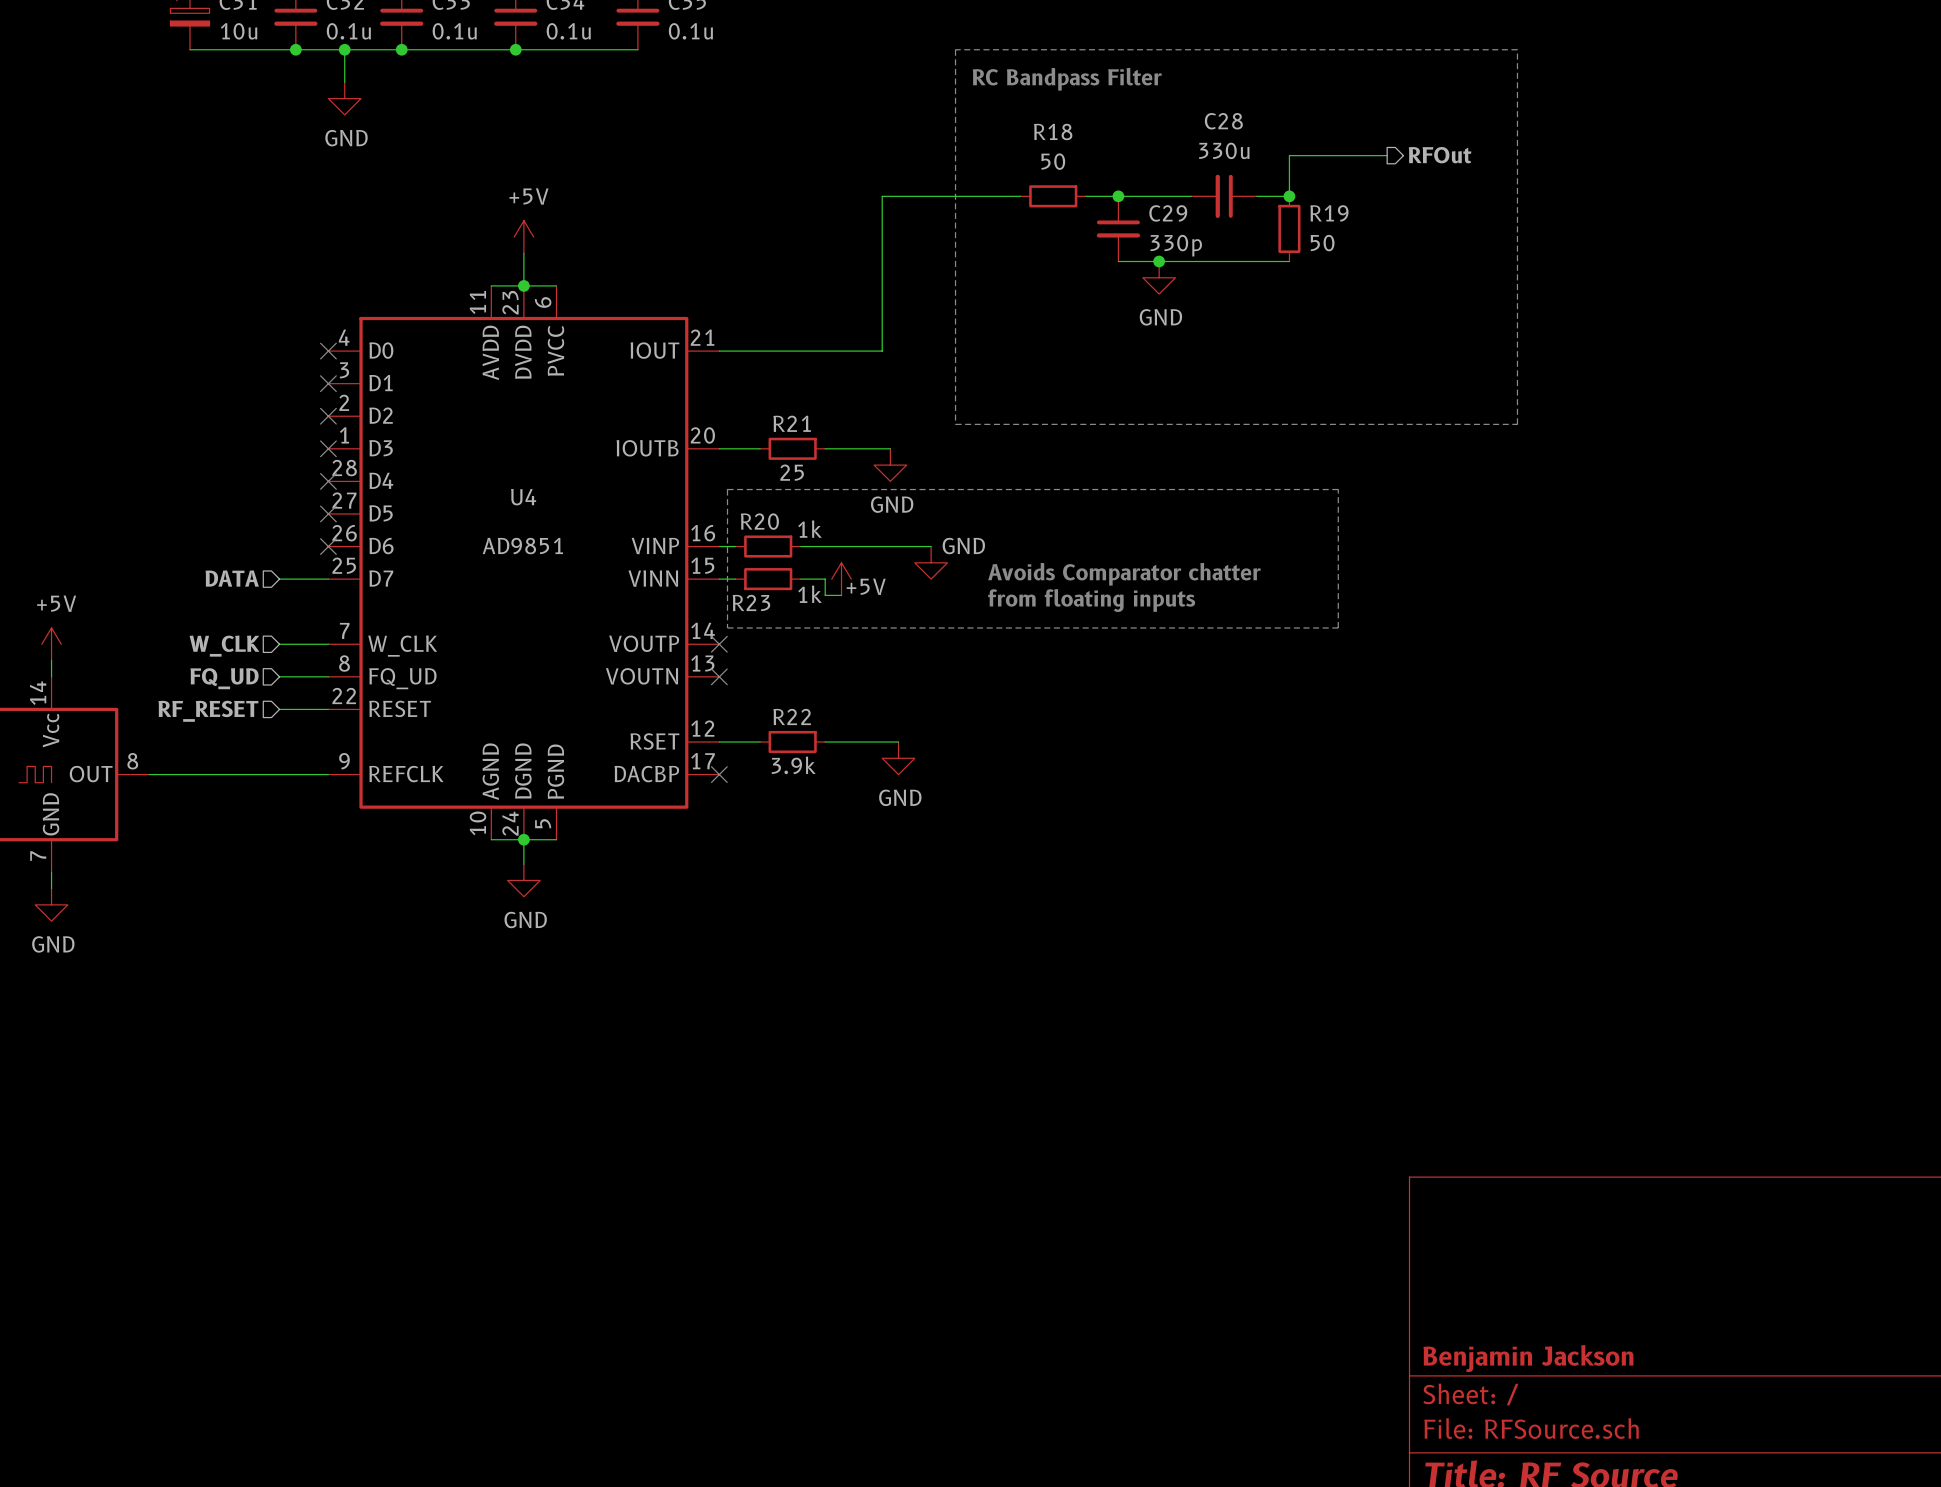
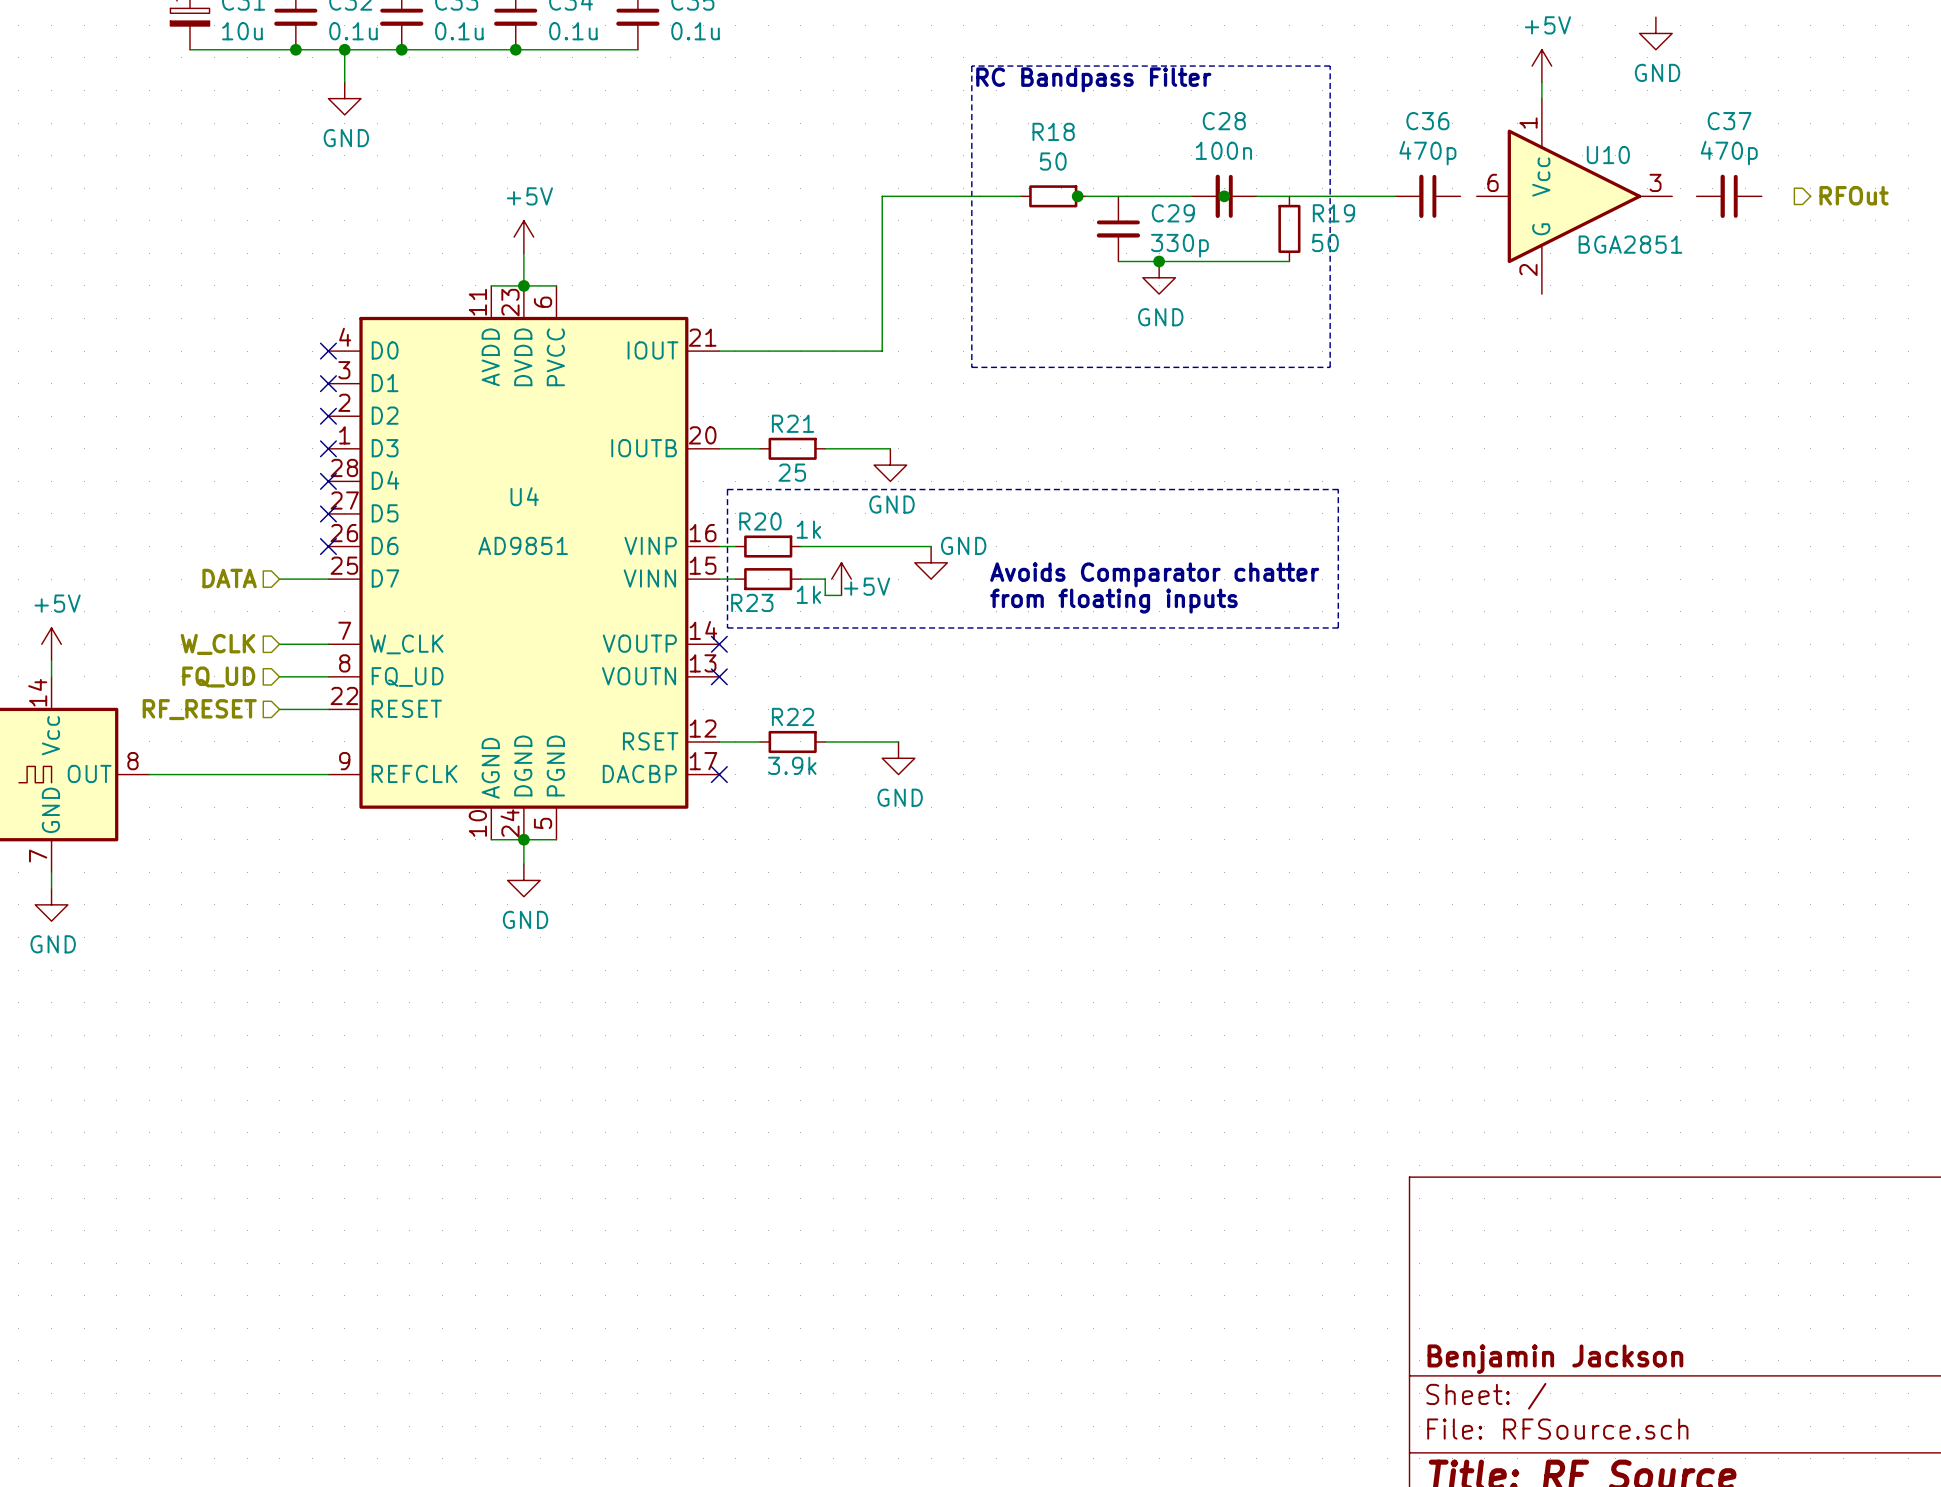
power symbol: none -> GND (1655, 33)
line: (955, 49) (955, 424) (1517, 424) (1517, 49) (955, 49) -> (971, 66) (971, 367) (1330, 367) (1330, 66) (971, 66)
power symbol: none -> +5V (1541, 66)
wire: none -> (1541, 82) (1541, 98)
C28 value: 330u (1224, 150) -> 100n (1223, 150)
wire: (1387, 155) (1289, 155) (1289, 196) -> (1395, 196) (1289, 196)
hierarchical label: RFOut (1440, 155) -> none
hierarchical label: none -> RFOut (1854, 195)
junction position: (1118, 196) -> (1077, 196)
junction: none -> (1224, 196)
junction: (1289, 196) -> none
C36: none -> 470p (1427, 196)
U10: none -> BGA2851 (1574, 196)
C37: none -> 470p (1729, 196)

